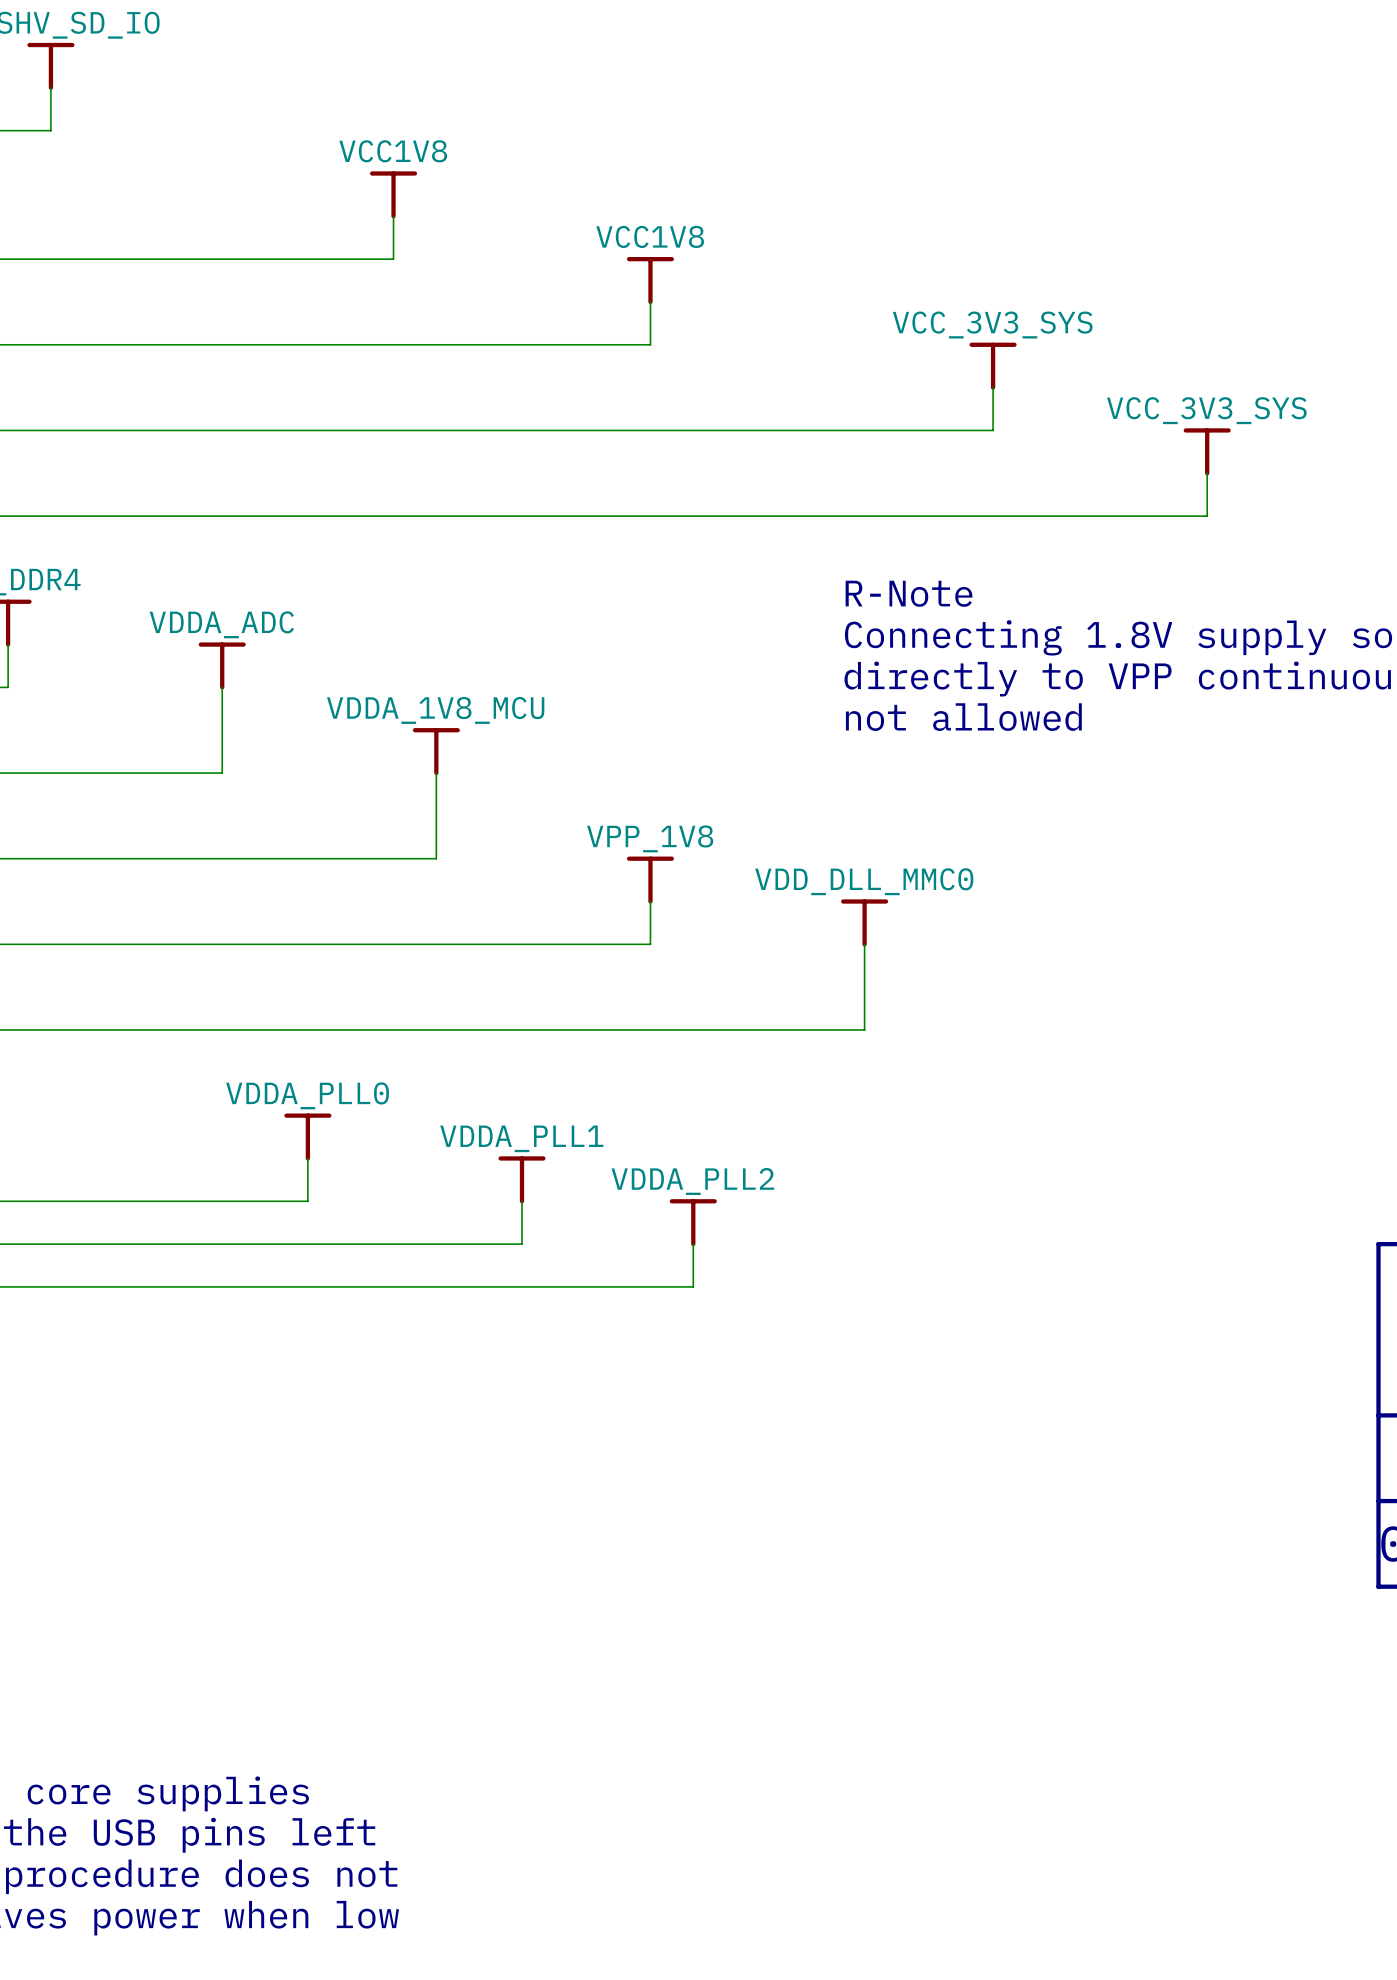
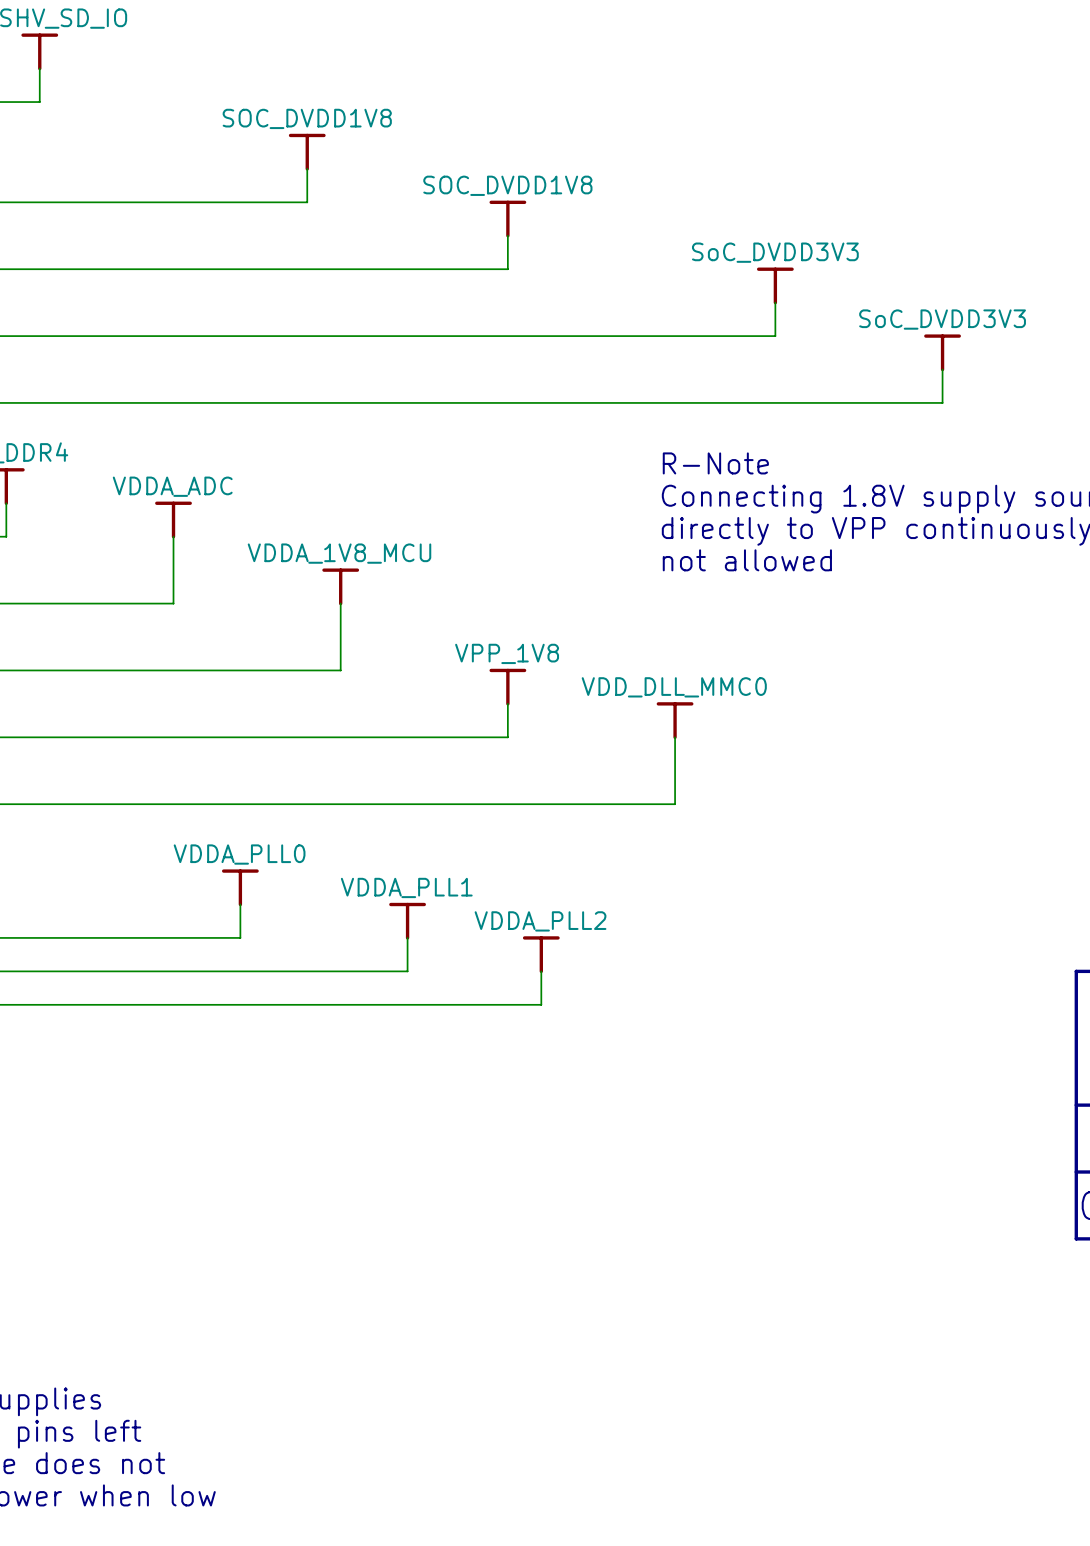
power symbol: VCC1V8 (393, 194) -> SOC_DVDD1V8 (307, 152)
power symbol: VCC1V8 (650, 280) -> SOC_DVDD1V8 (507, 219)
power symbol: VCC_3V3_SYS (993, 366) -> SoC_DVDD3V3 (775, 285)
power symbol: VCC_3V3_SYS (1207, 451) -> SoC_DVDD3V3 (942, 352)

